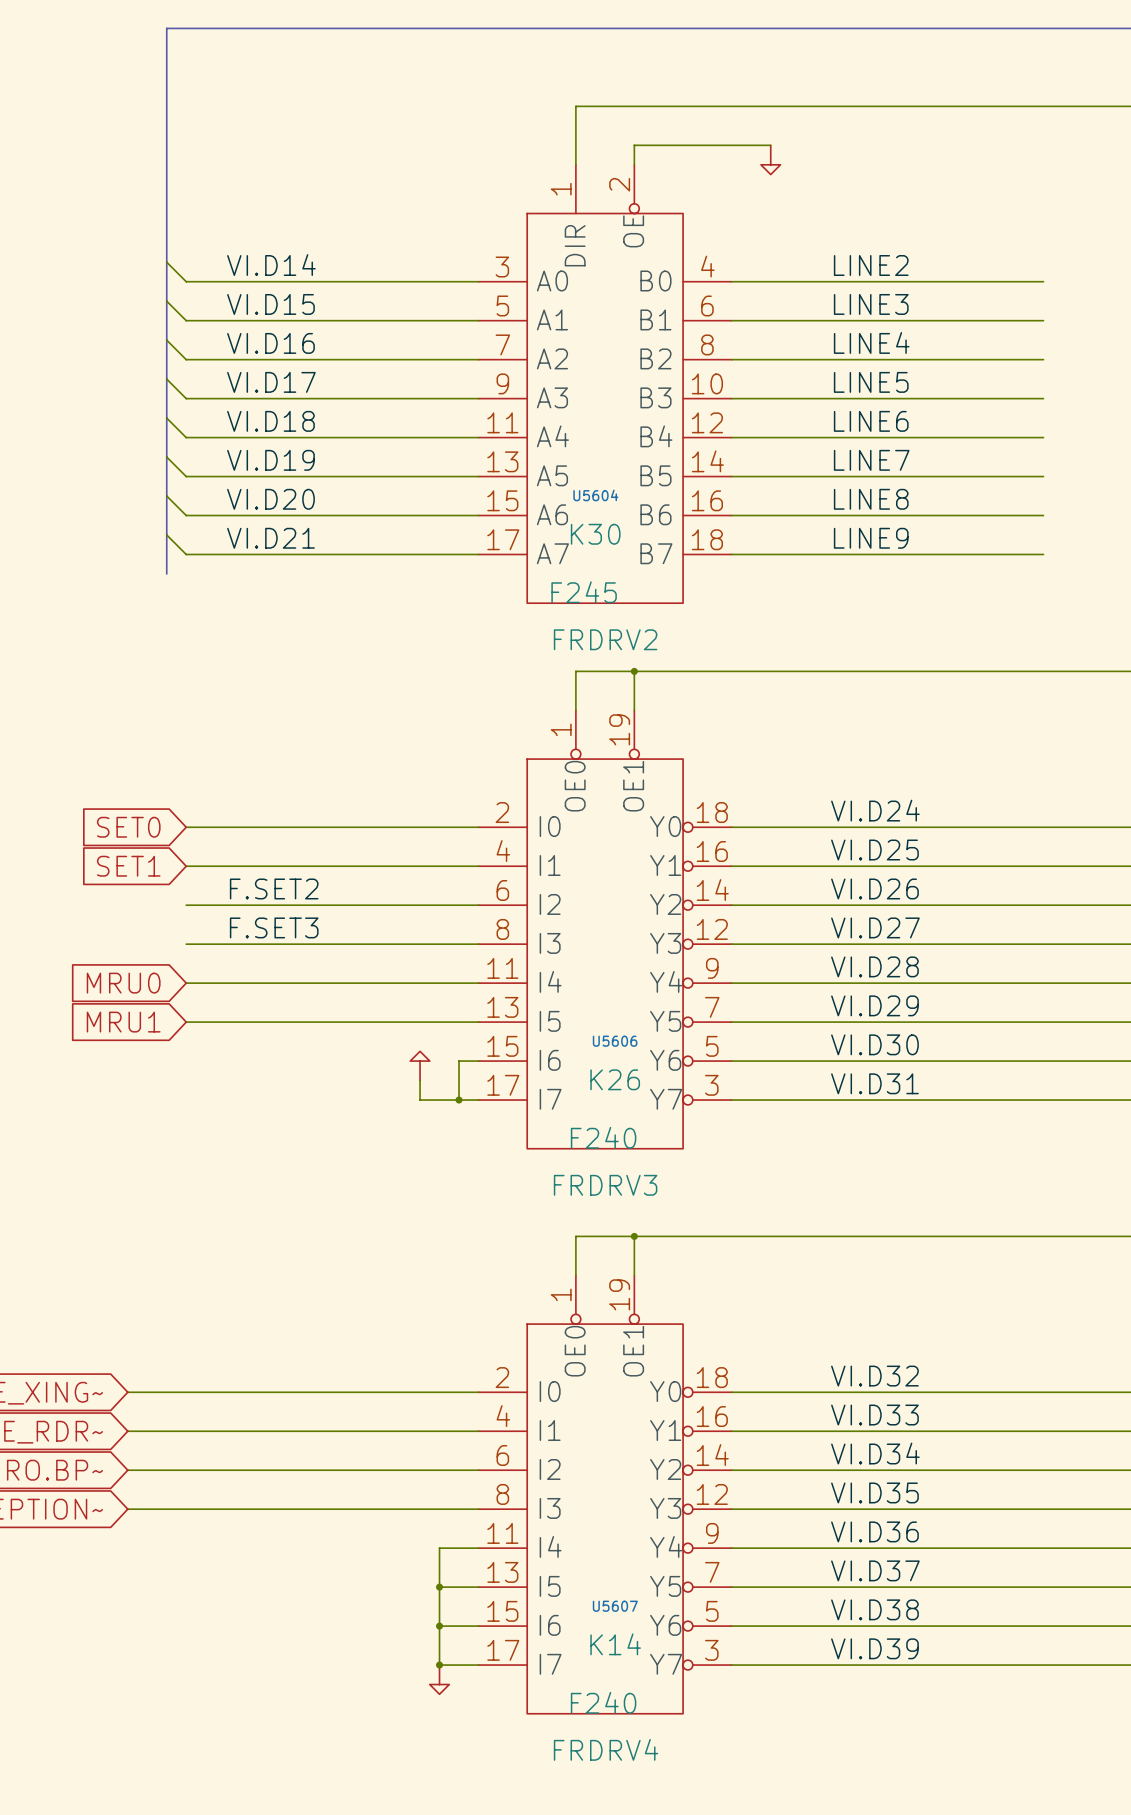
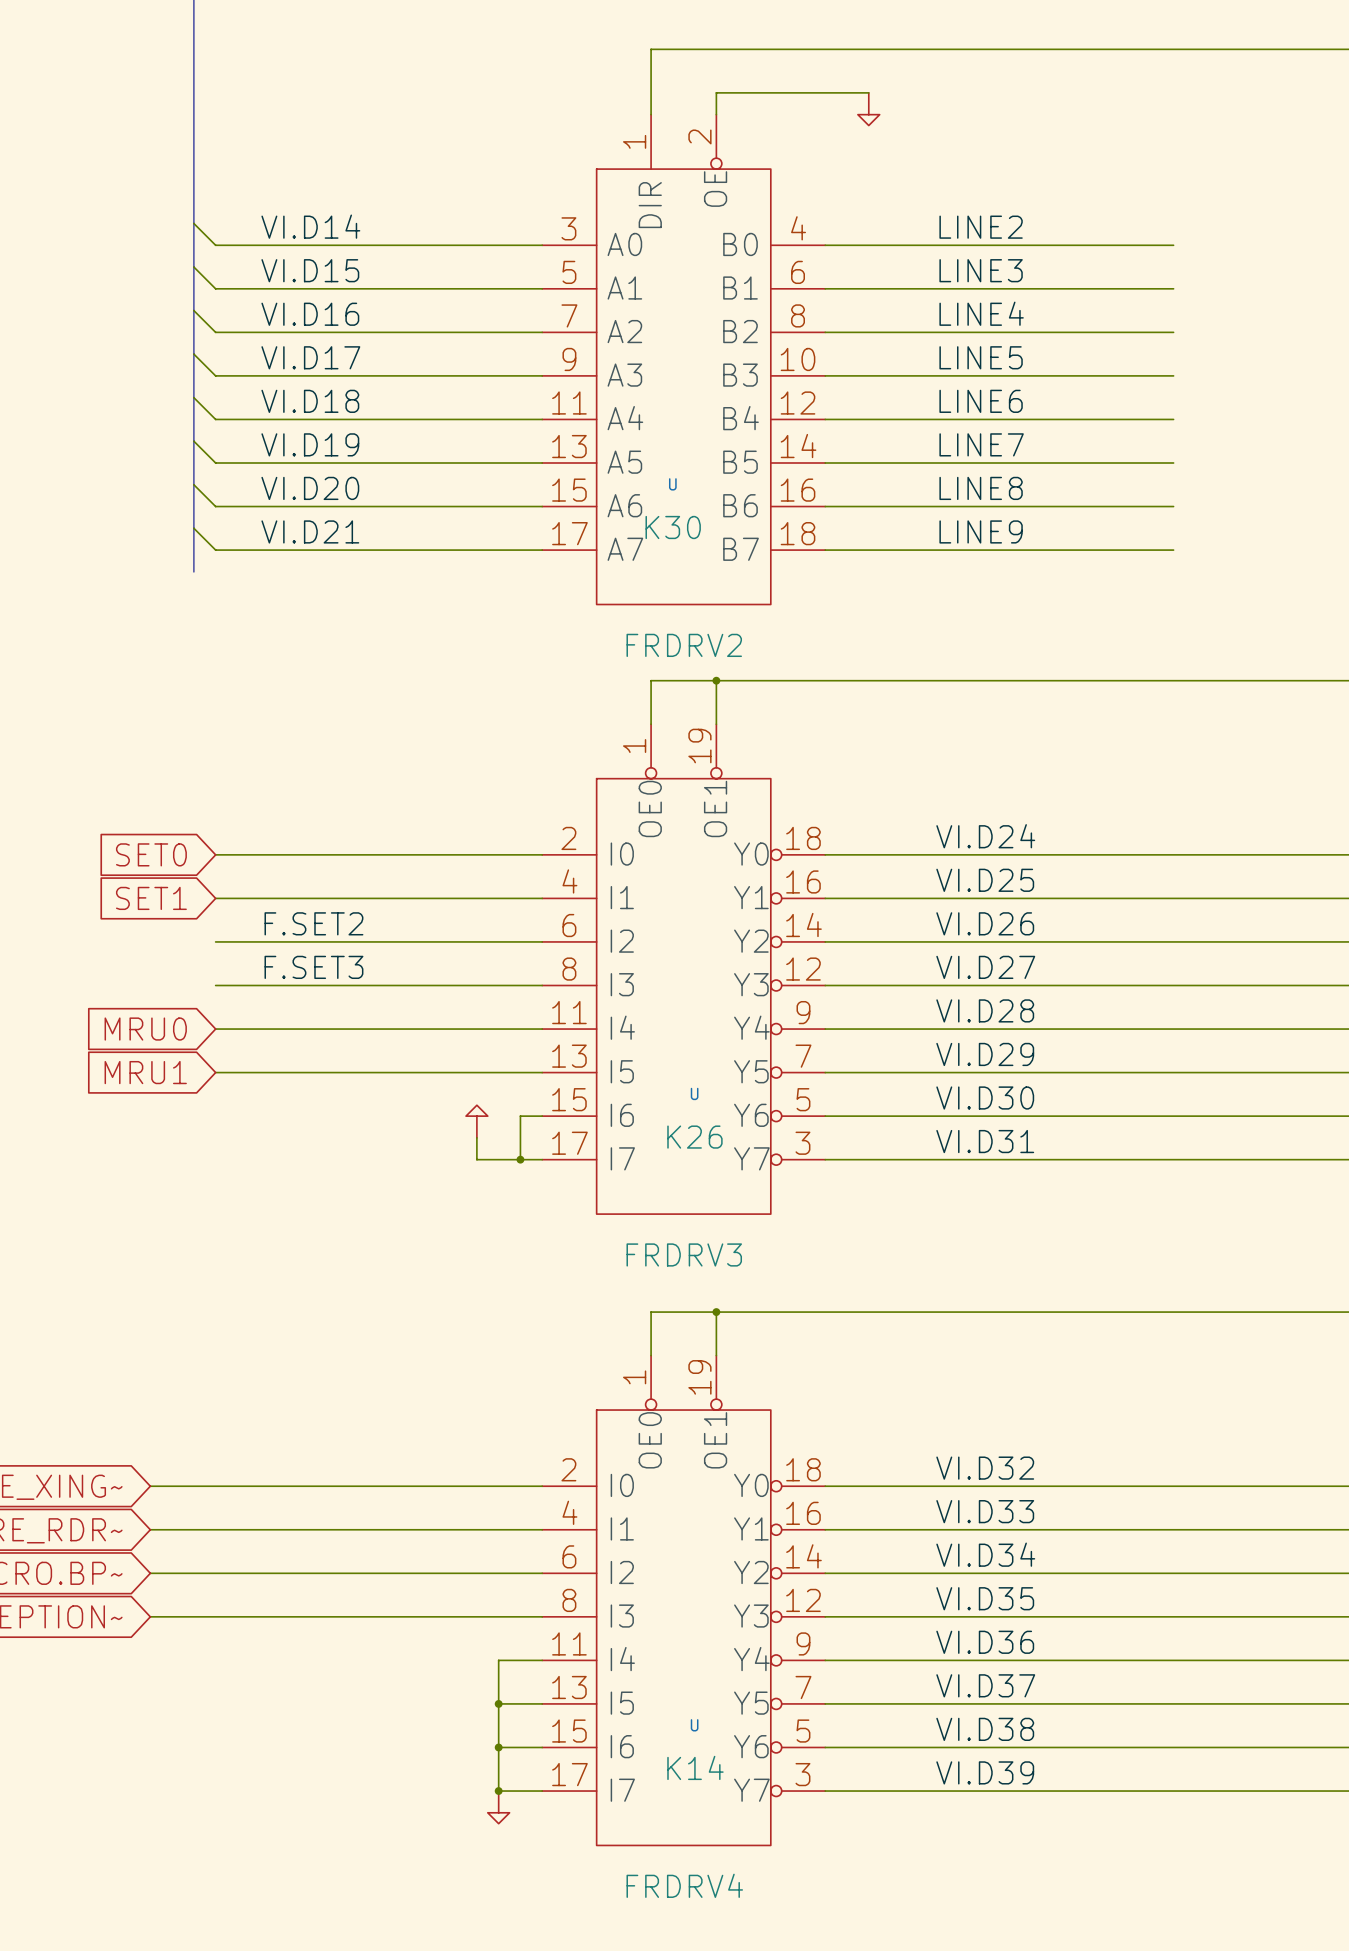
U5604 name: U5604 (595, 495) -> U (672, 484)
U5604 value: F245 (584, 592) -> none
U5606 name: U5606 (615, 1041) -> U (694, 1093)
U5606 value: F240 (603, 1137) -> none
U5607 name: U5607 (615, 1606) -> U (694, 1725)
U5607 value: F240 (603, 1702) -> none

